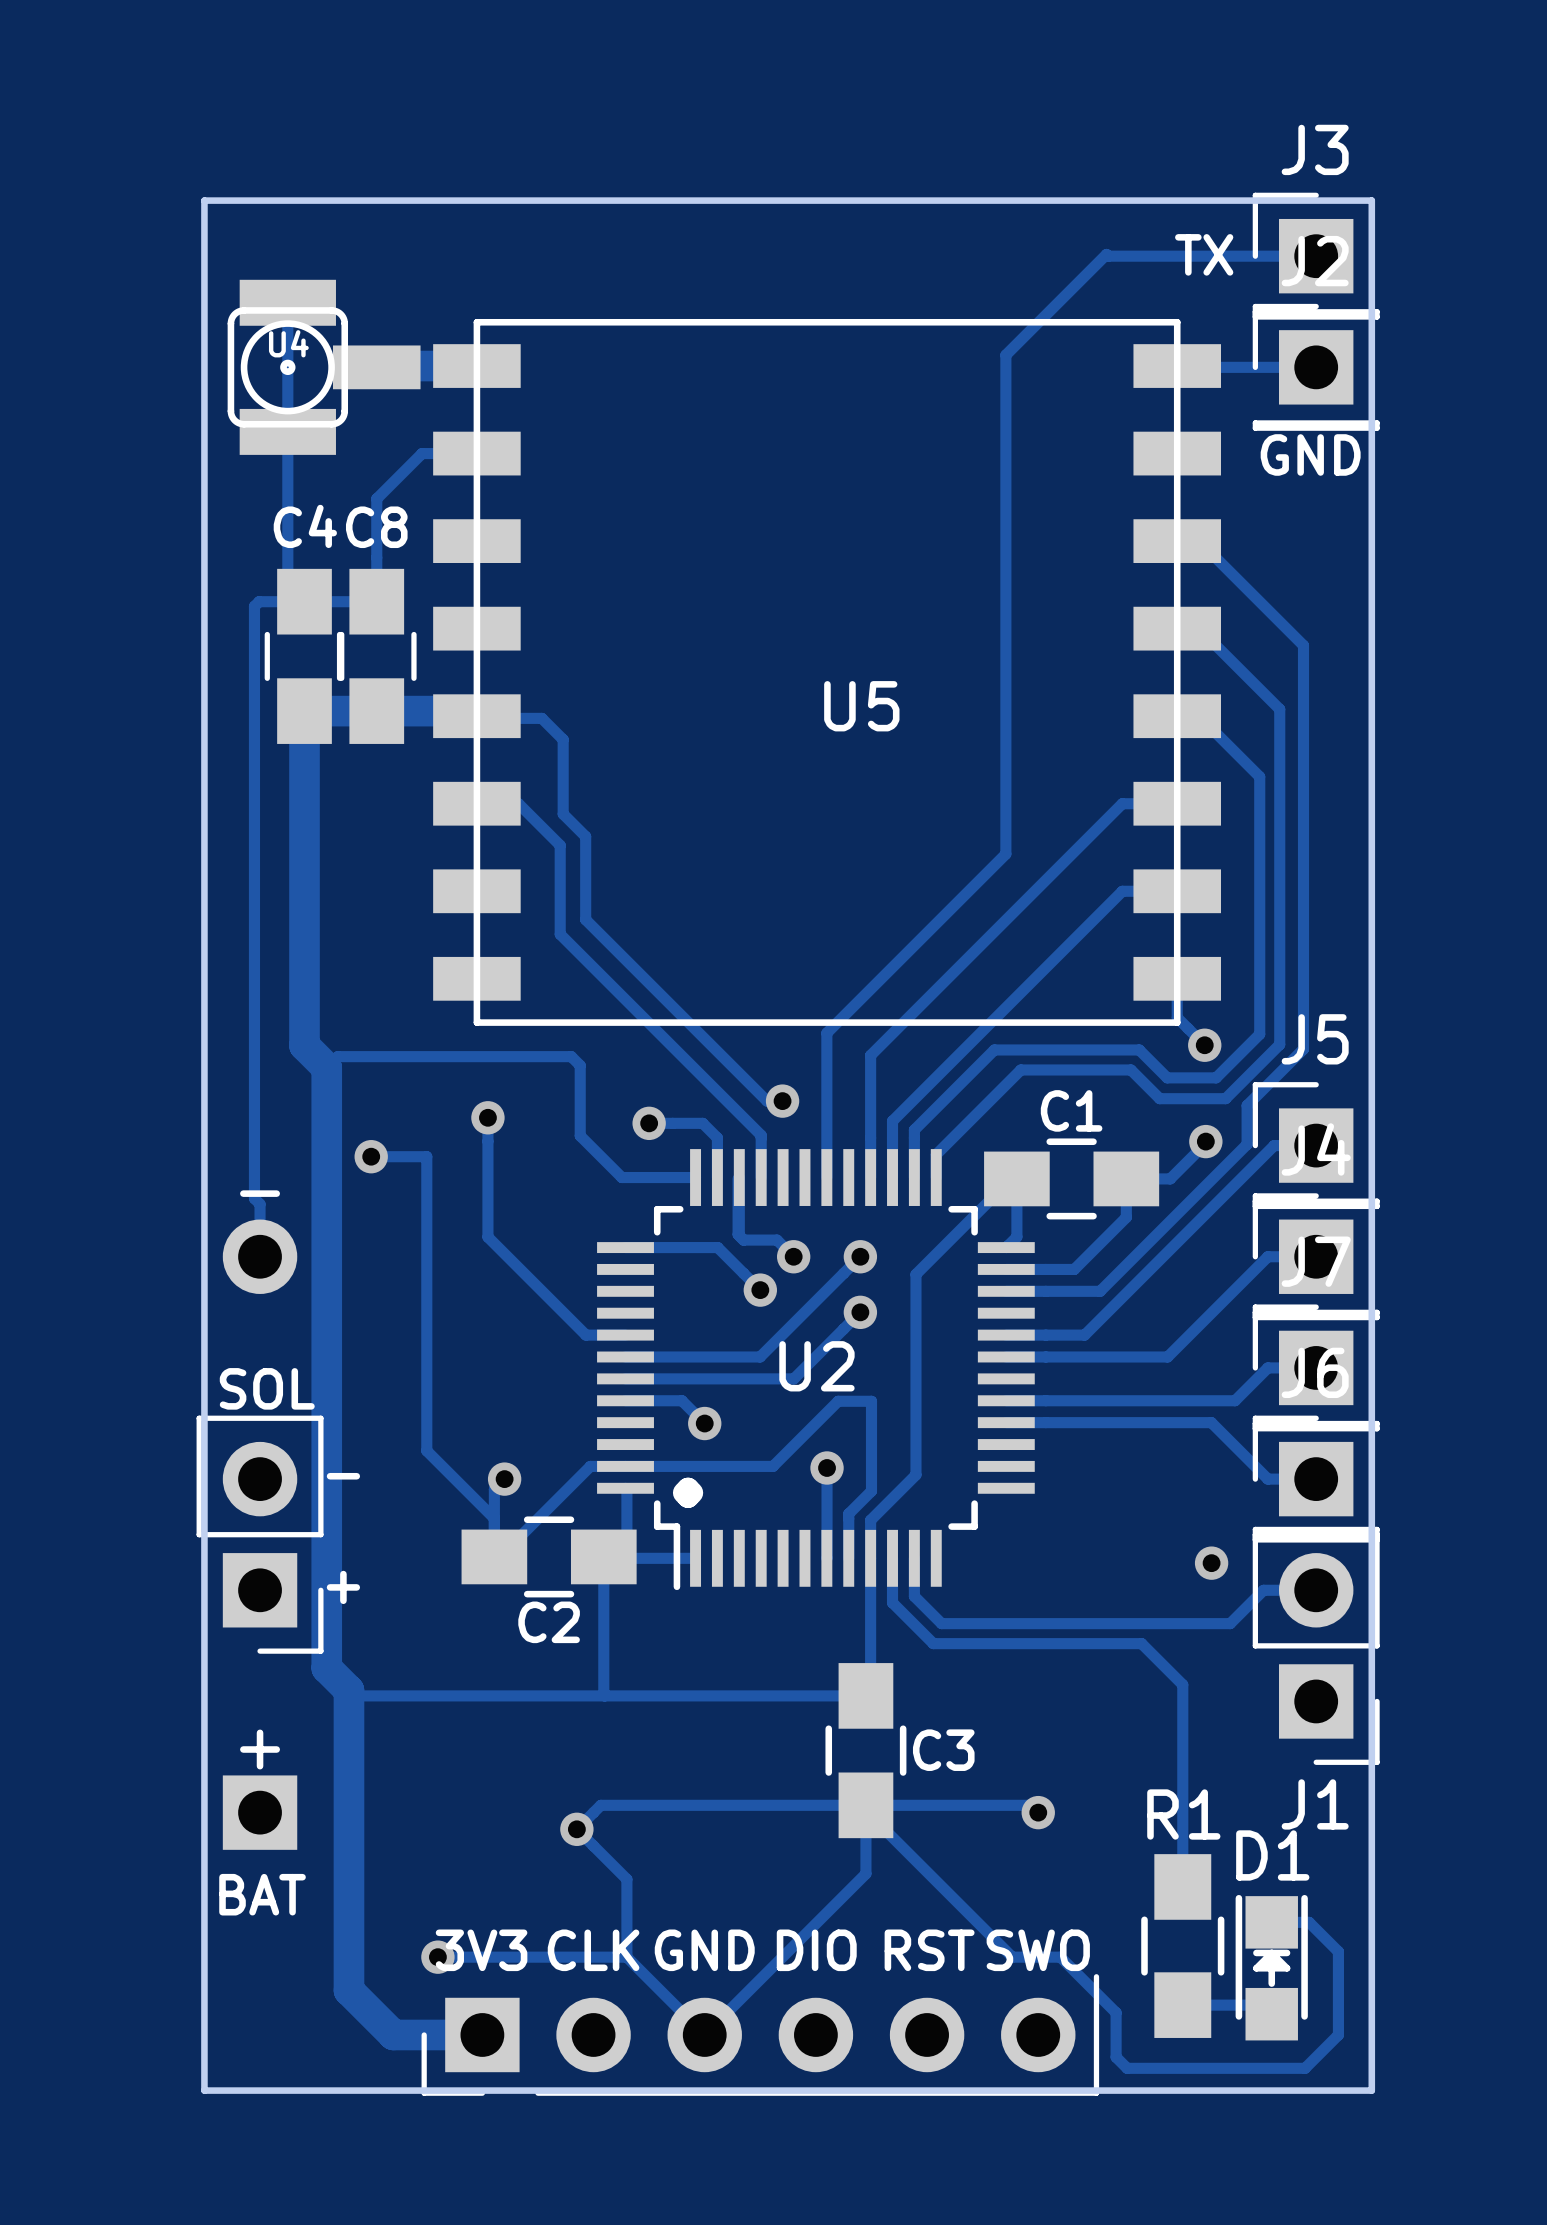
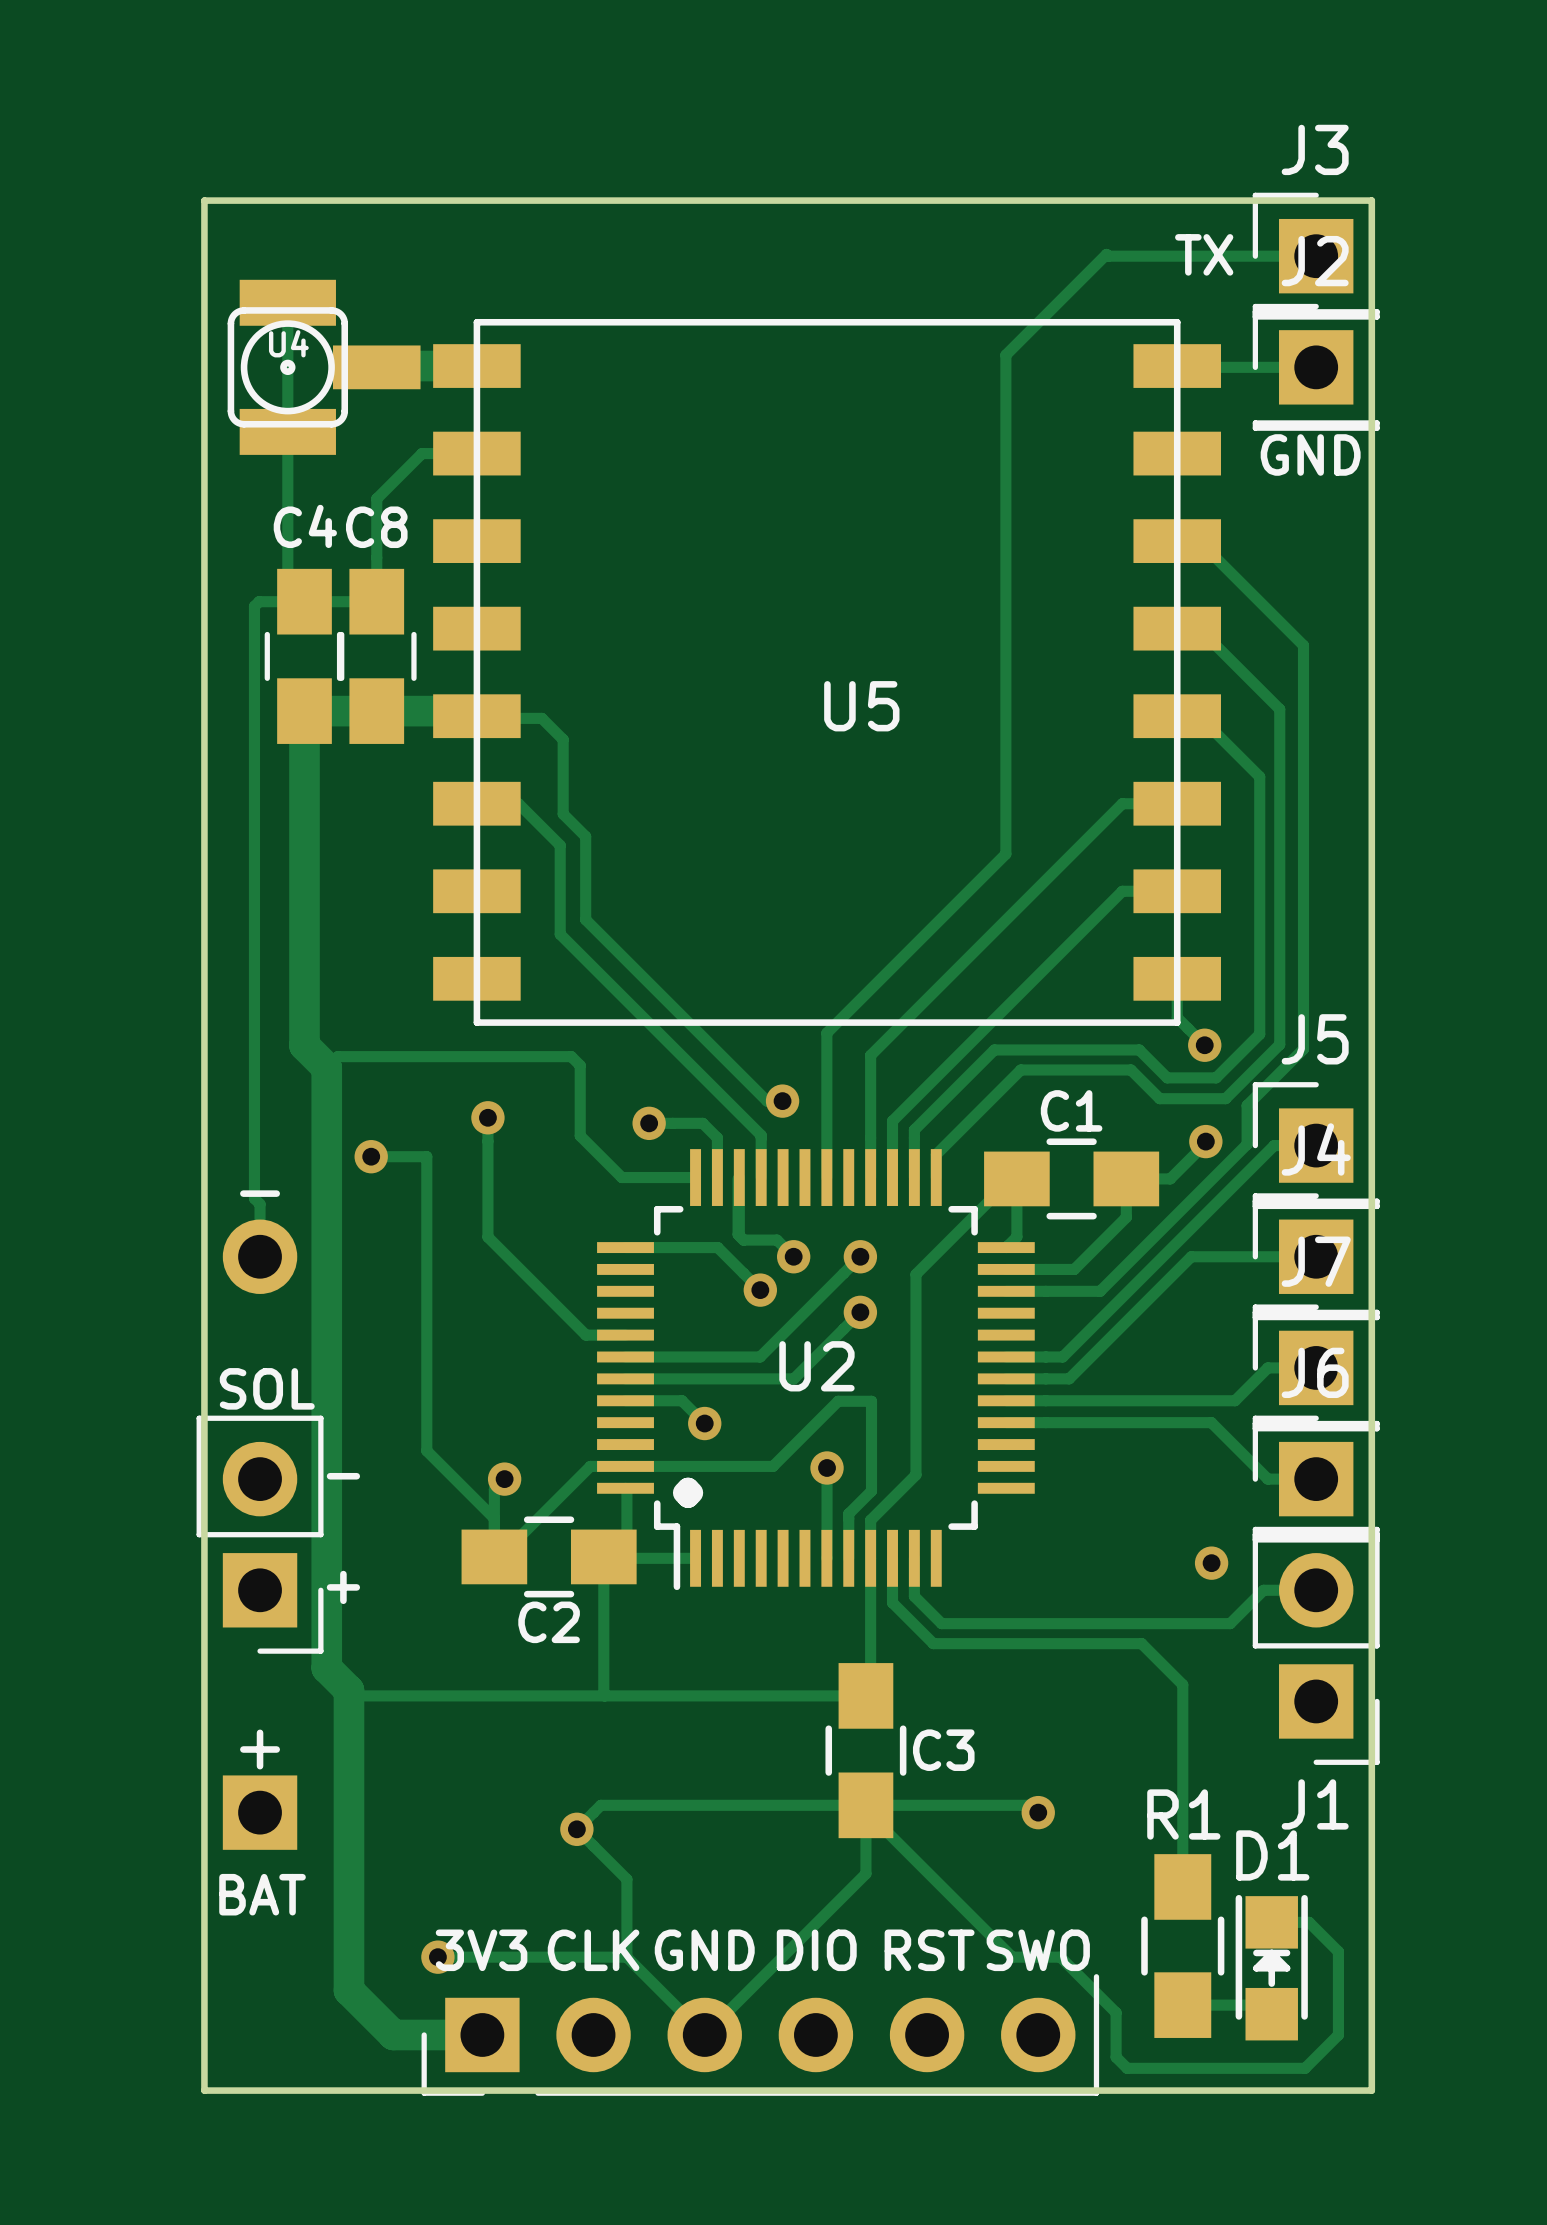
track: (1267, 1256) (1167, 1356) (1062, 1356) -> (1267, 1256) (1191, 1256) (1069, 1378) (1006, 1378)
track: (1006, 1335) (1084, 1335) -> (1062, 1356) (1084, 1335)

